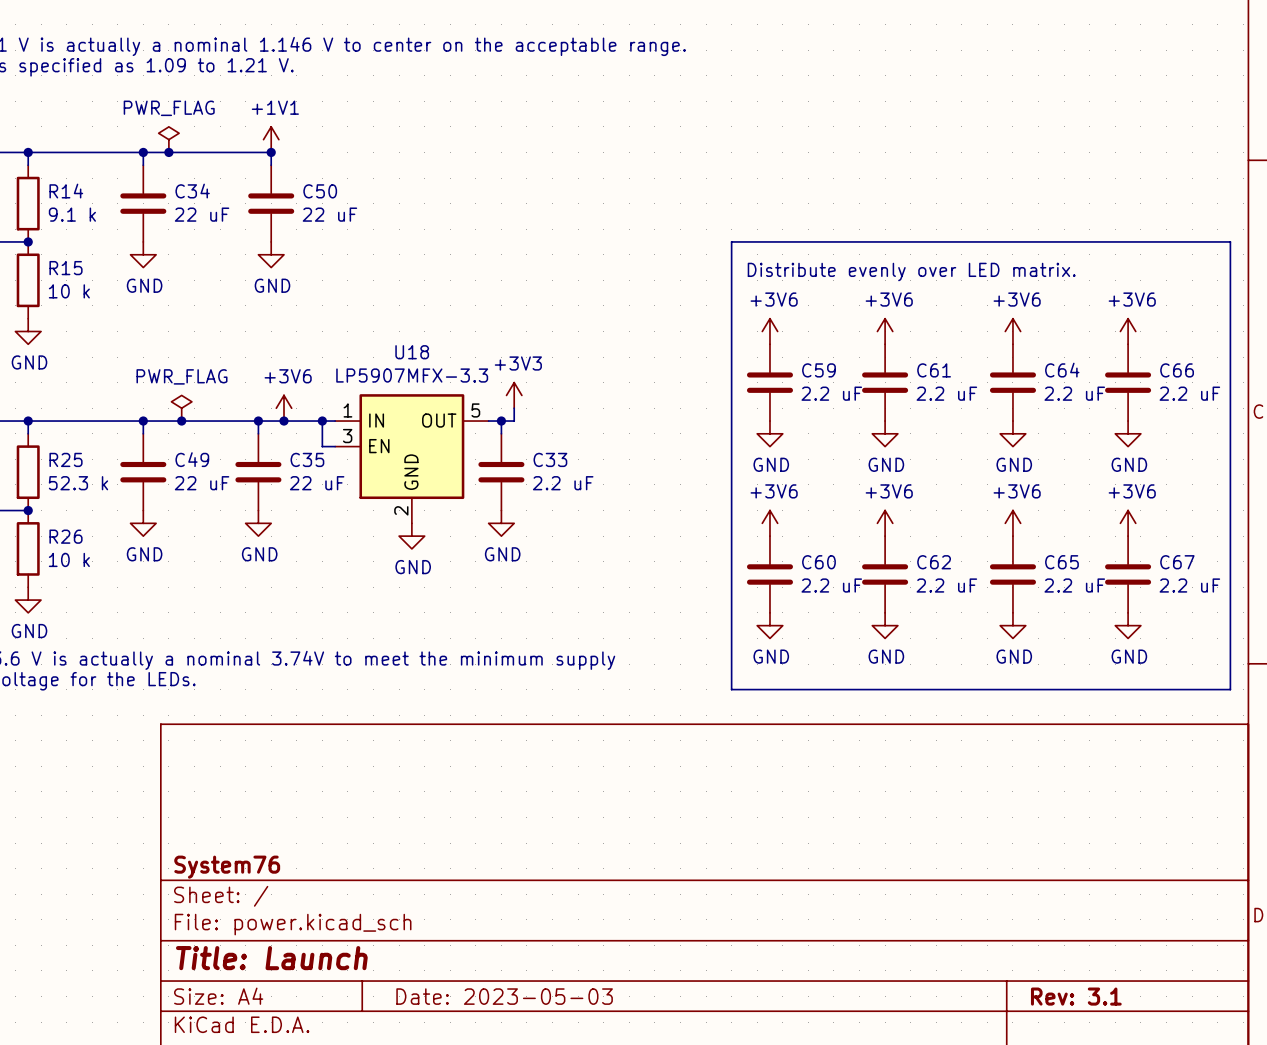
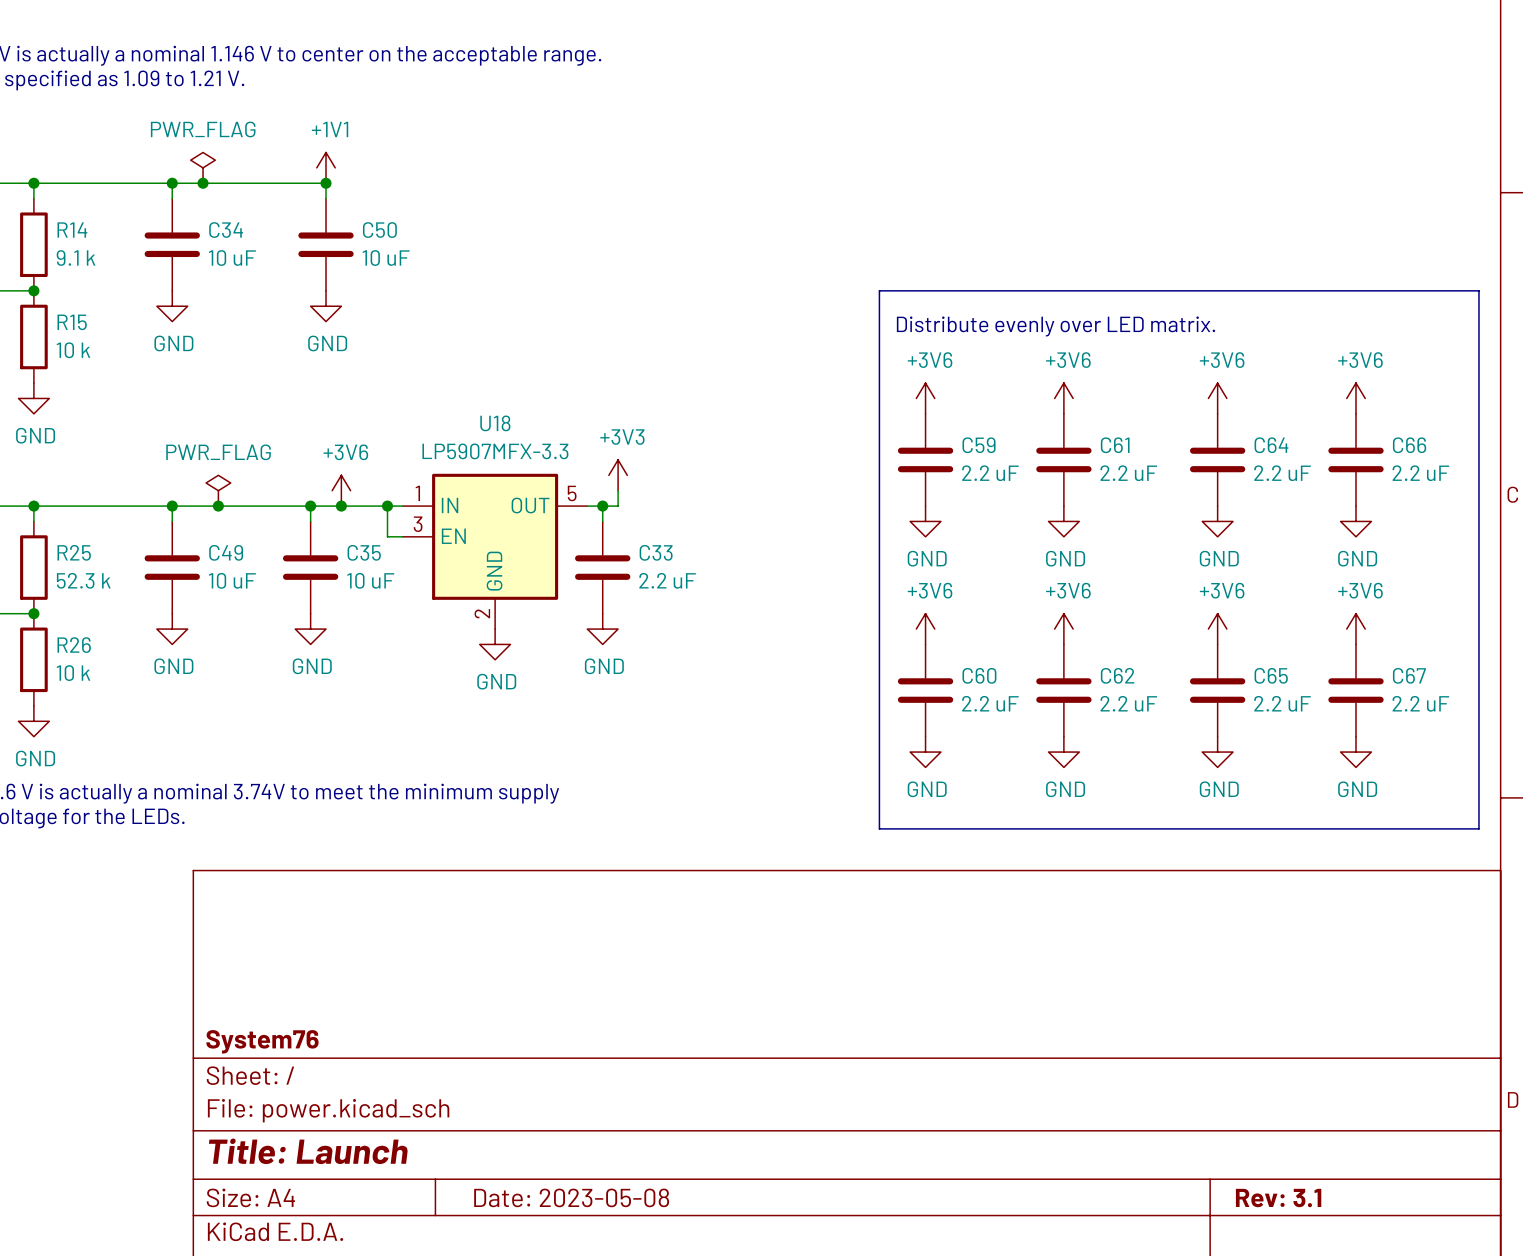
C34 value: 22 uF (202, 214) -> 10 uF (232, 258)
C50 value: 22 uF (329, 214) -> 10 uF (386, 258)
C49 value: 22 uF (202, 483) -> 10 uF (232, 580)
C35 value: 22 uF (317, 483) -> 10 uF (370, 580)
title block: Date: 2023-05-03 (504, 996) -> Date: 2023-05-08 (571, 1197)

